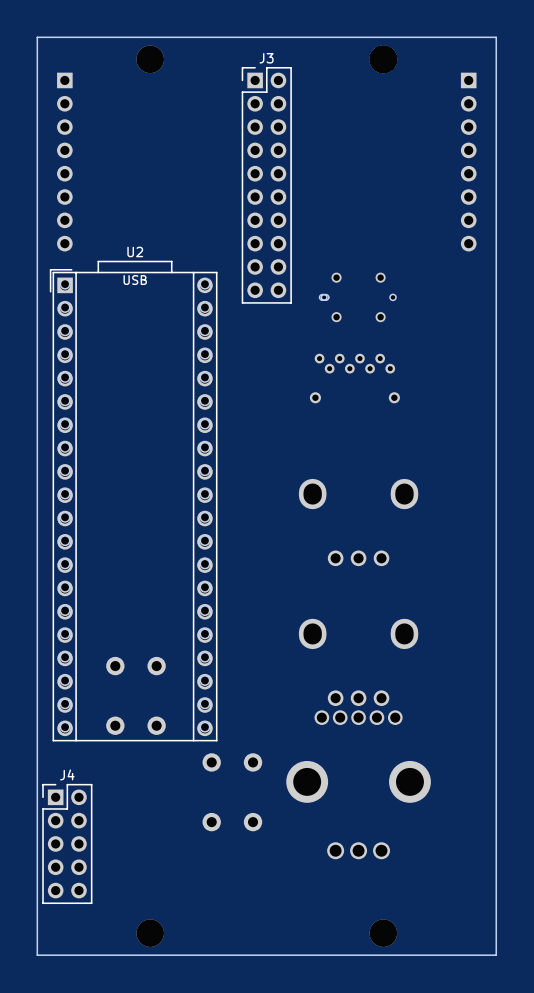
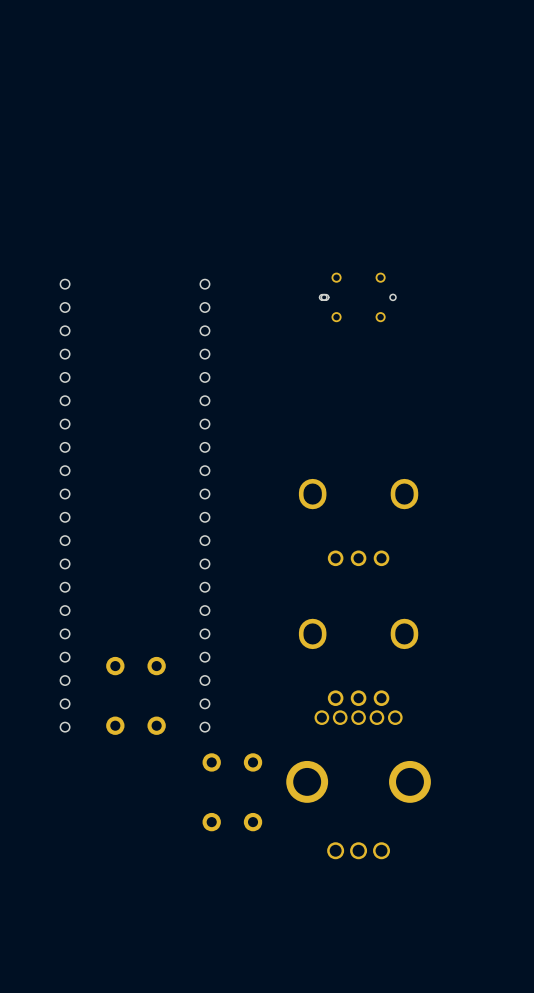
board edge: (496, 37) (37, 37) (37, 955) (496, 955) (496, 37) -> none
part: (150, 59) -> none
part: (383, 59) -> none
part: (64, 162) -> none
part: (468, 162) -> none
J3: (266, 185) -> none
part: (354, 378) -> none
U2: (133, 501) -> none
J4: (67, 843) -> none
part: (150, 933) -> none
part: (383, 933) -> none

